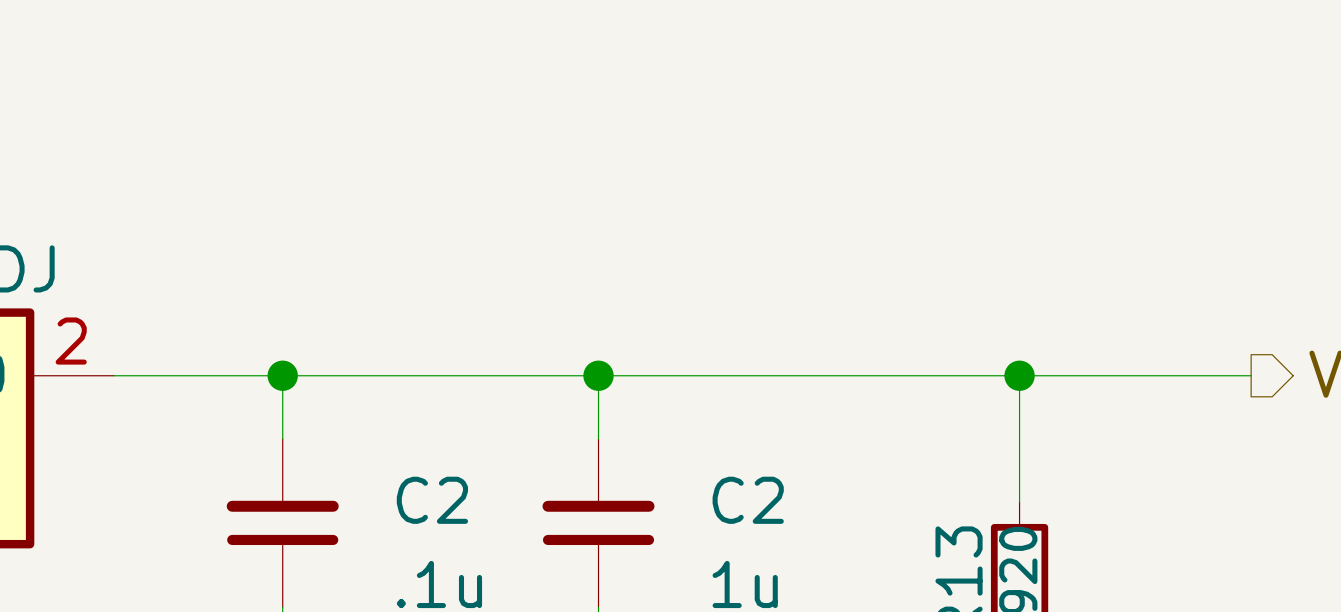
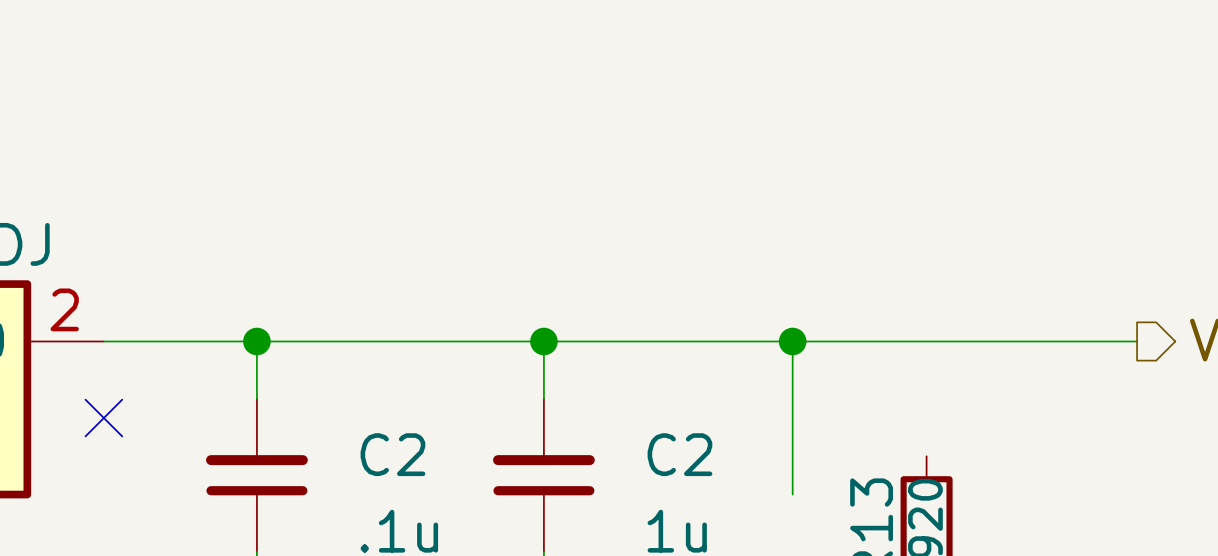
wire: none -> (792, 341) (792, 494)
wire: (1019, 375) (1019, 502) -> none
junction position: (1019, 375) -> (792, 341)
no-connect mark: none -> (103, 418)

